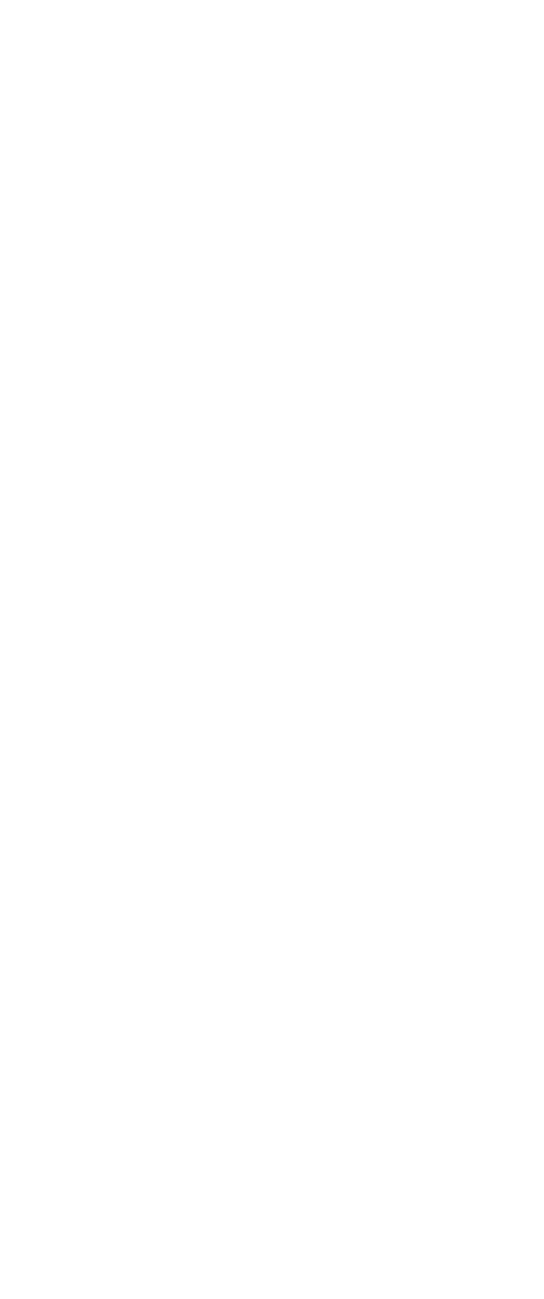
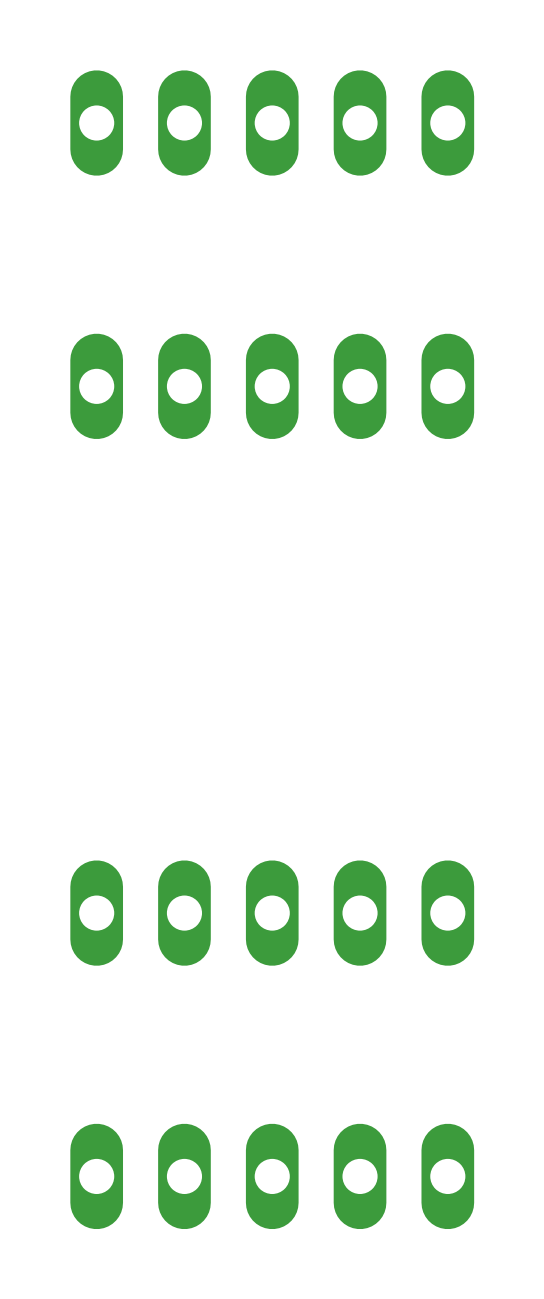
part: none -> (272, 123)
part: none -> (272, 386)
part: none -> (272, 913)
part: none -> (272, 1176)

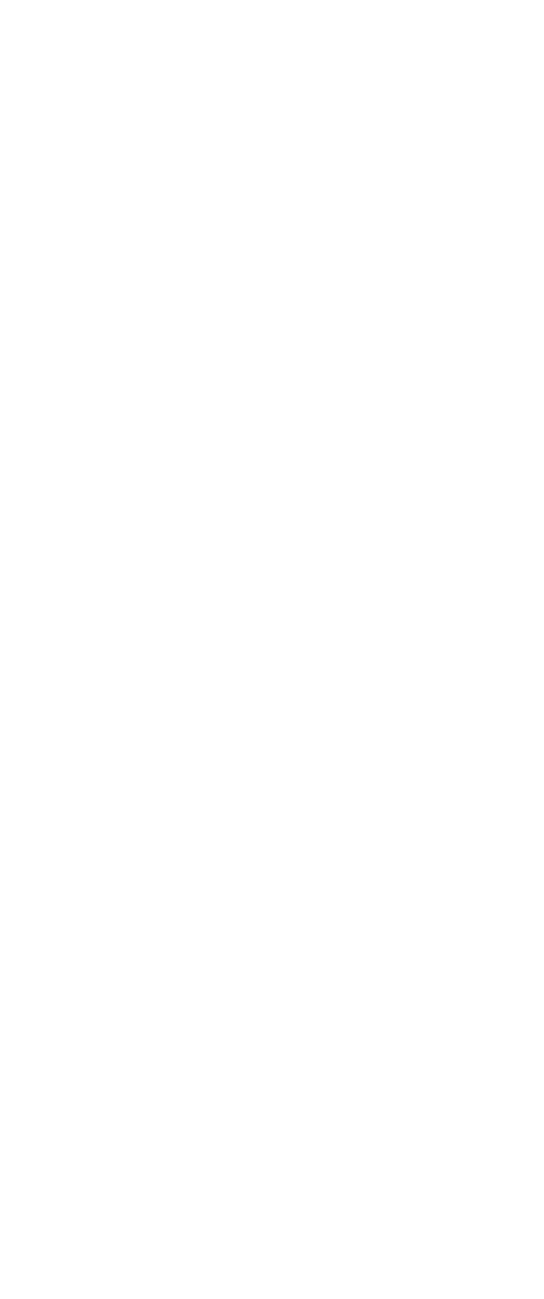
part: (272, 123) -> none
part: (272, 386) -> none
part: (272, 913) -> none
part: (272, 1176) -> none

